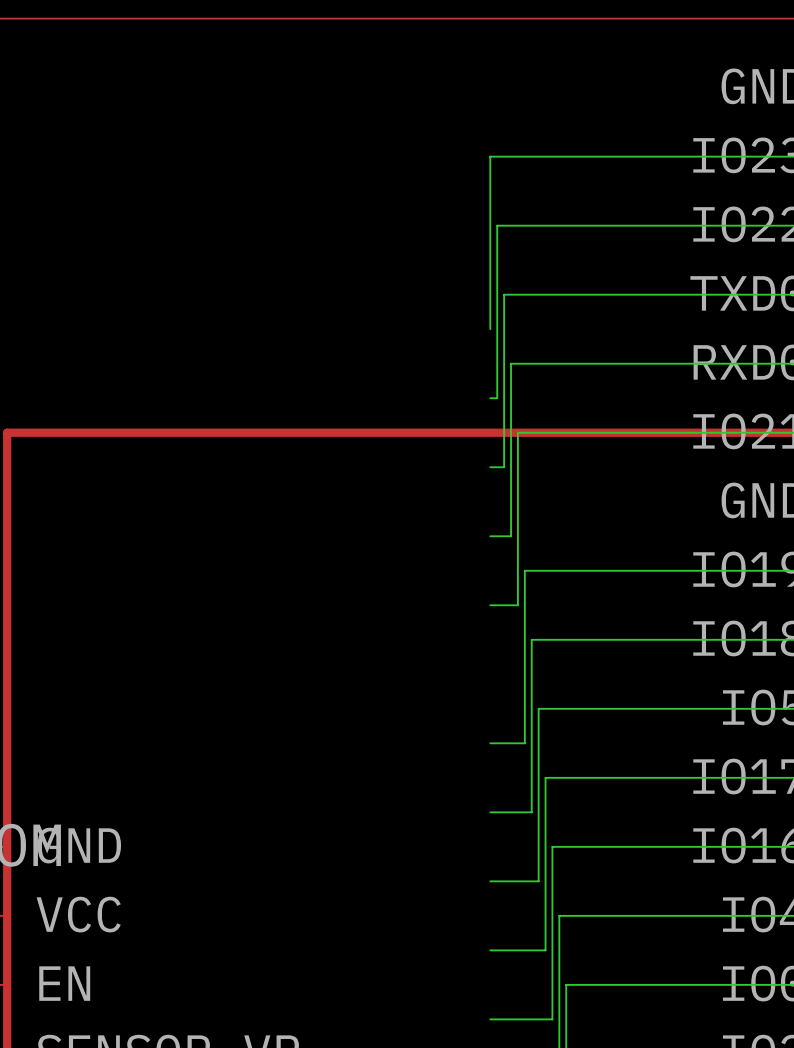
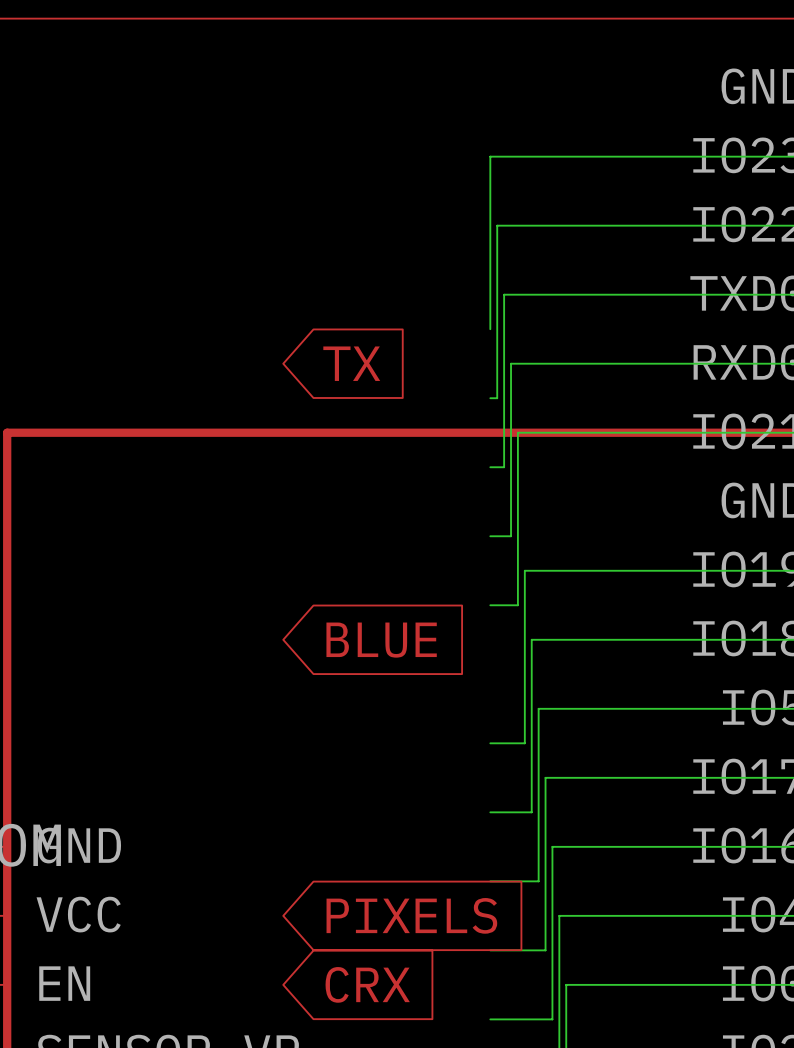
global label: none -> TX (351, 363)
global label: none -> BLUE (381, 640)
global label: none -> PIXELS (411, 915)
global label: none -> CRX (367, 984)

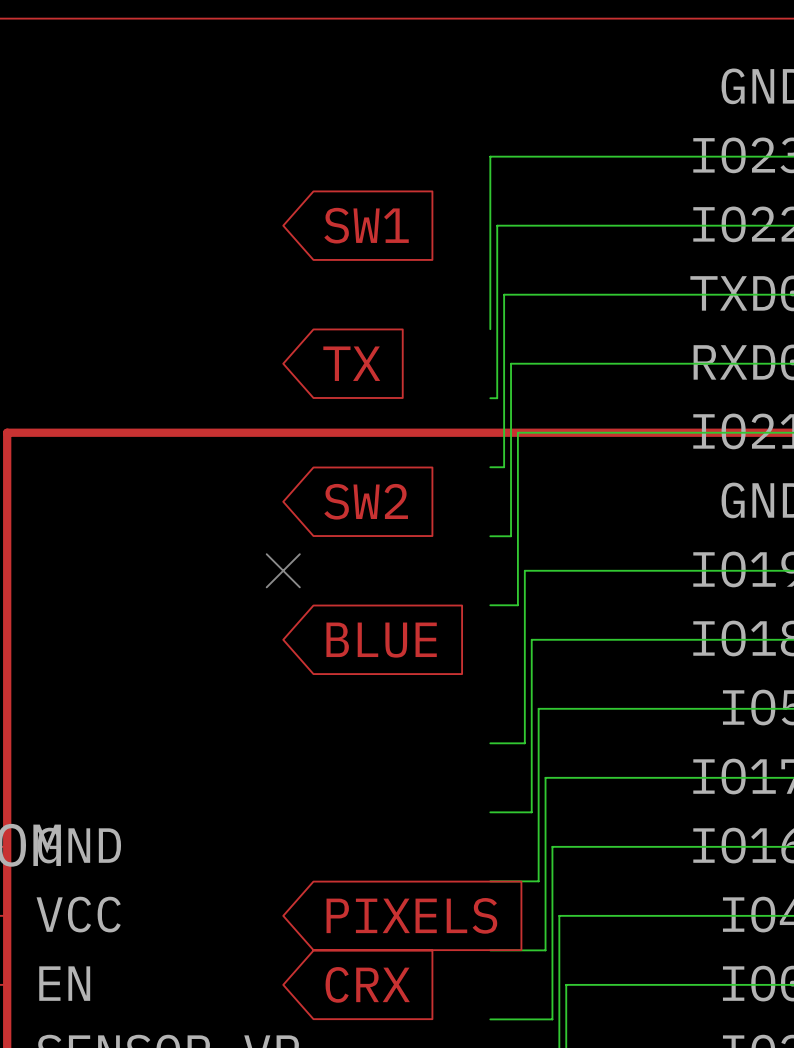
global label: none -> SW1 (366, 225)
global label: none -> SW2 (366, 501)
no-connect mark: none -> (283, 570)

